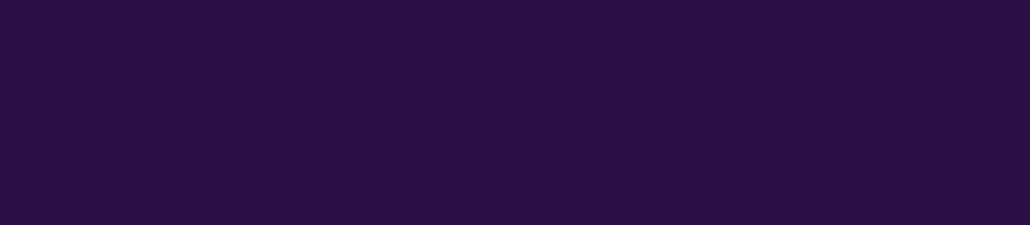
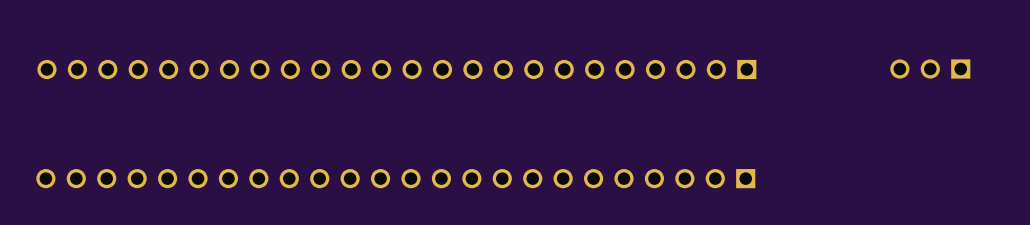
part: none -> (396, 69)
part: none -> (930, 69)
part: none -> (395, 178)

